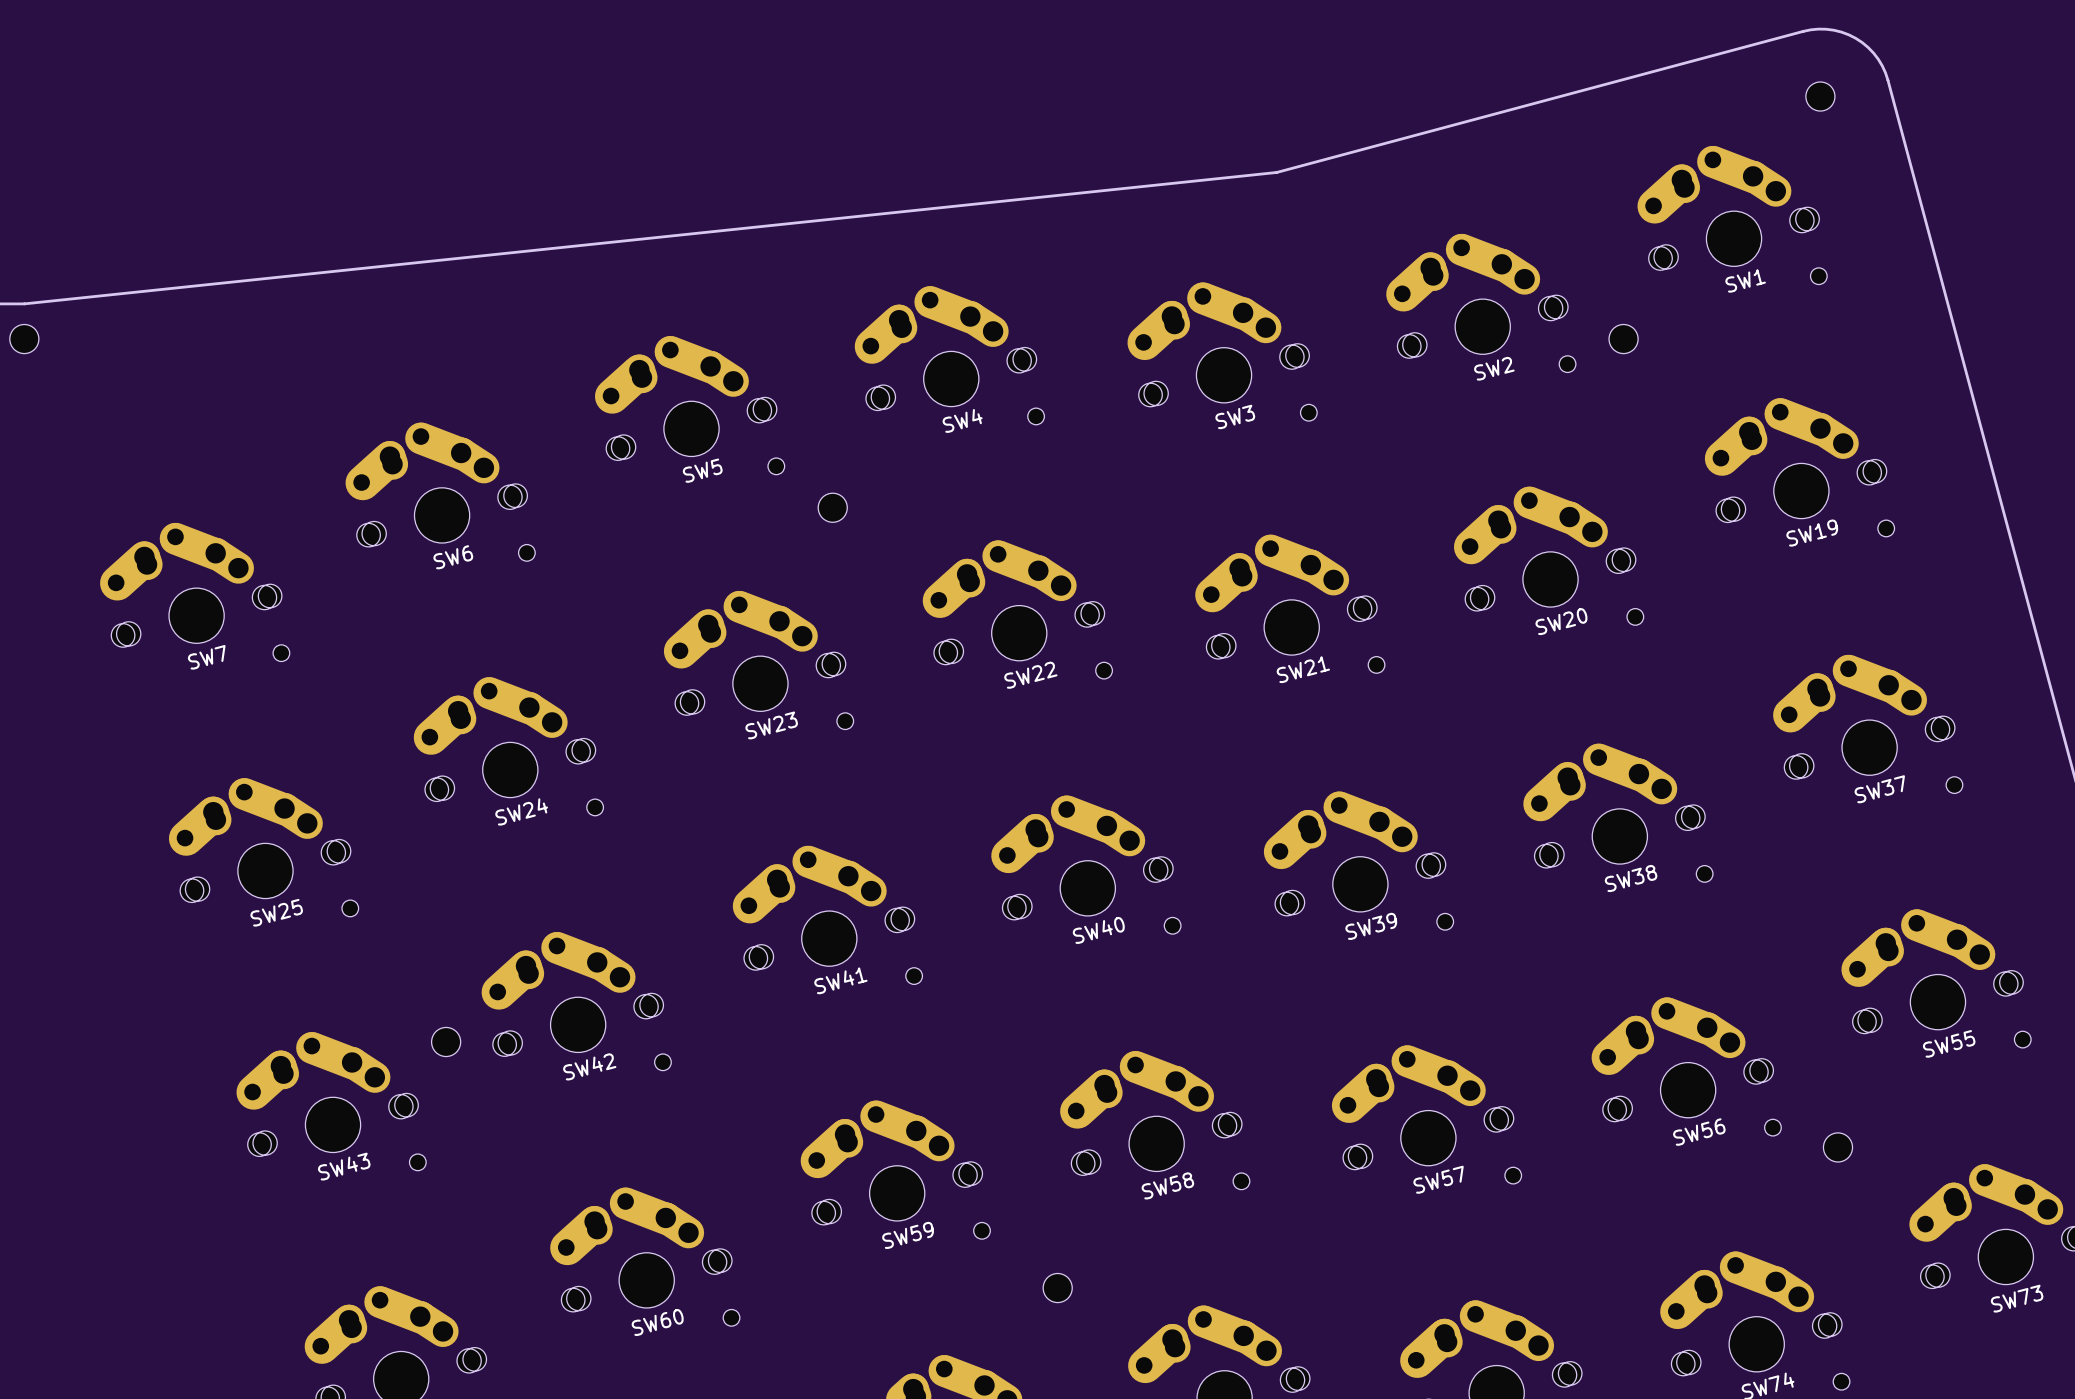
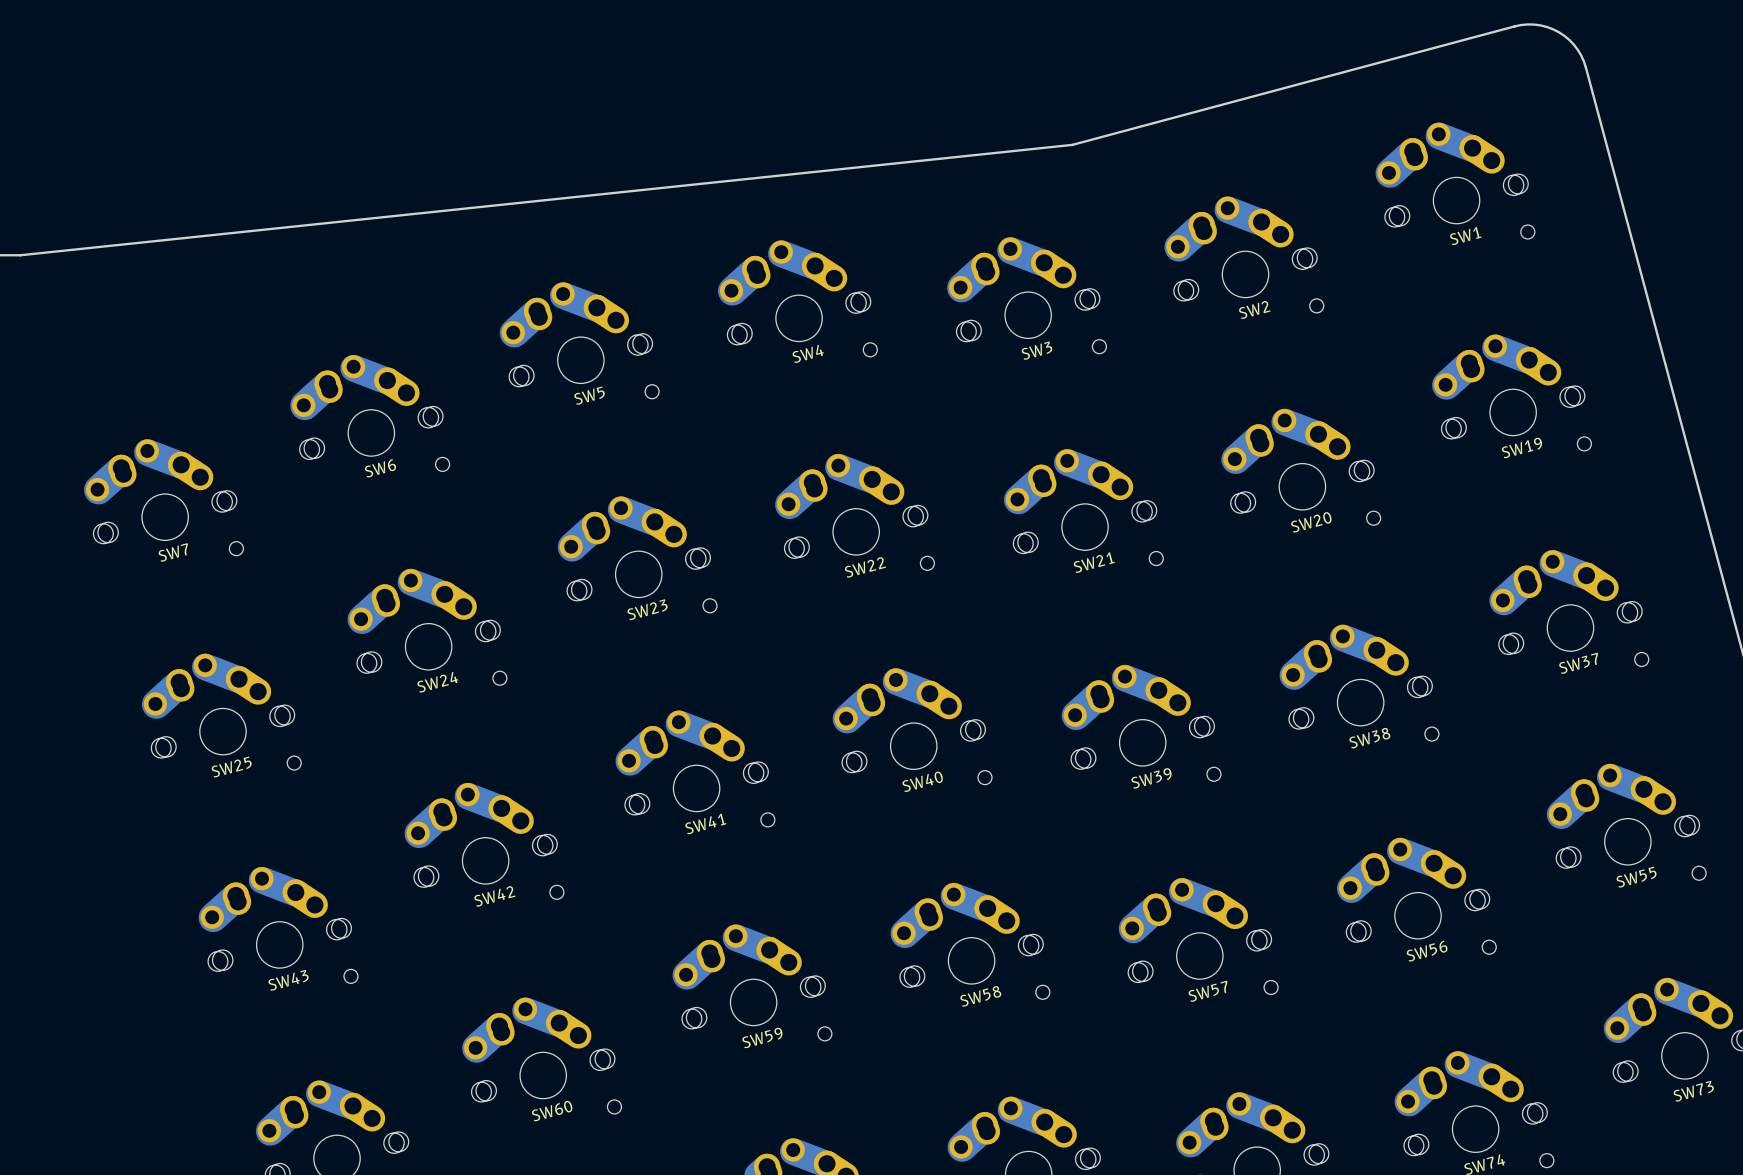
part: (1820, 96) -> none
part: (24, 339) -> none
part: (1623, 339) -> none
part: (832, 507) -> none
part: (446, 1042) -> none
part: (1837, 1147) -> none
part: (1057, 1288) -> none

